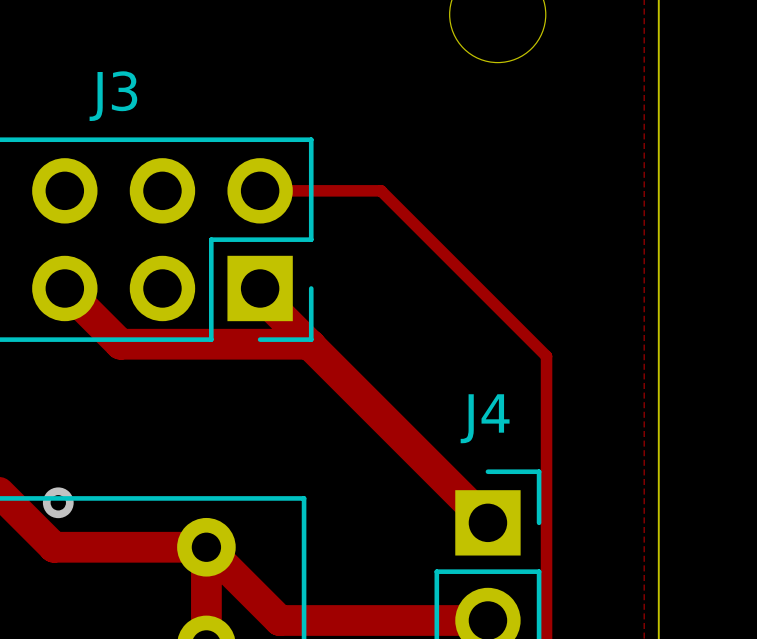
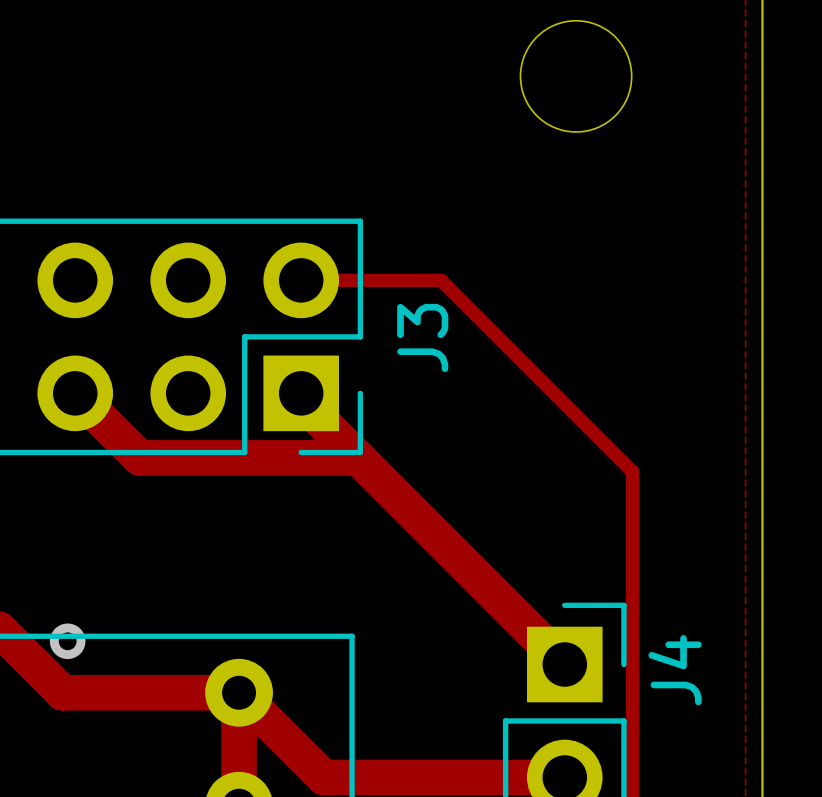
J3 name rotation: 0° (113, 96) -> 90° counterclockwise (422, 337)
J3 name position: J3 (113, 96) -> J3 (422, 337)
J4 name rotation: 0° (485, 418) -> 90° counterclockwise (675, 670)
J4 name position: J4 (485, 418) -> J4 (675, 670)

